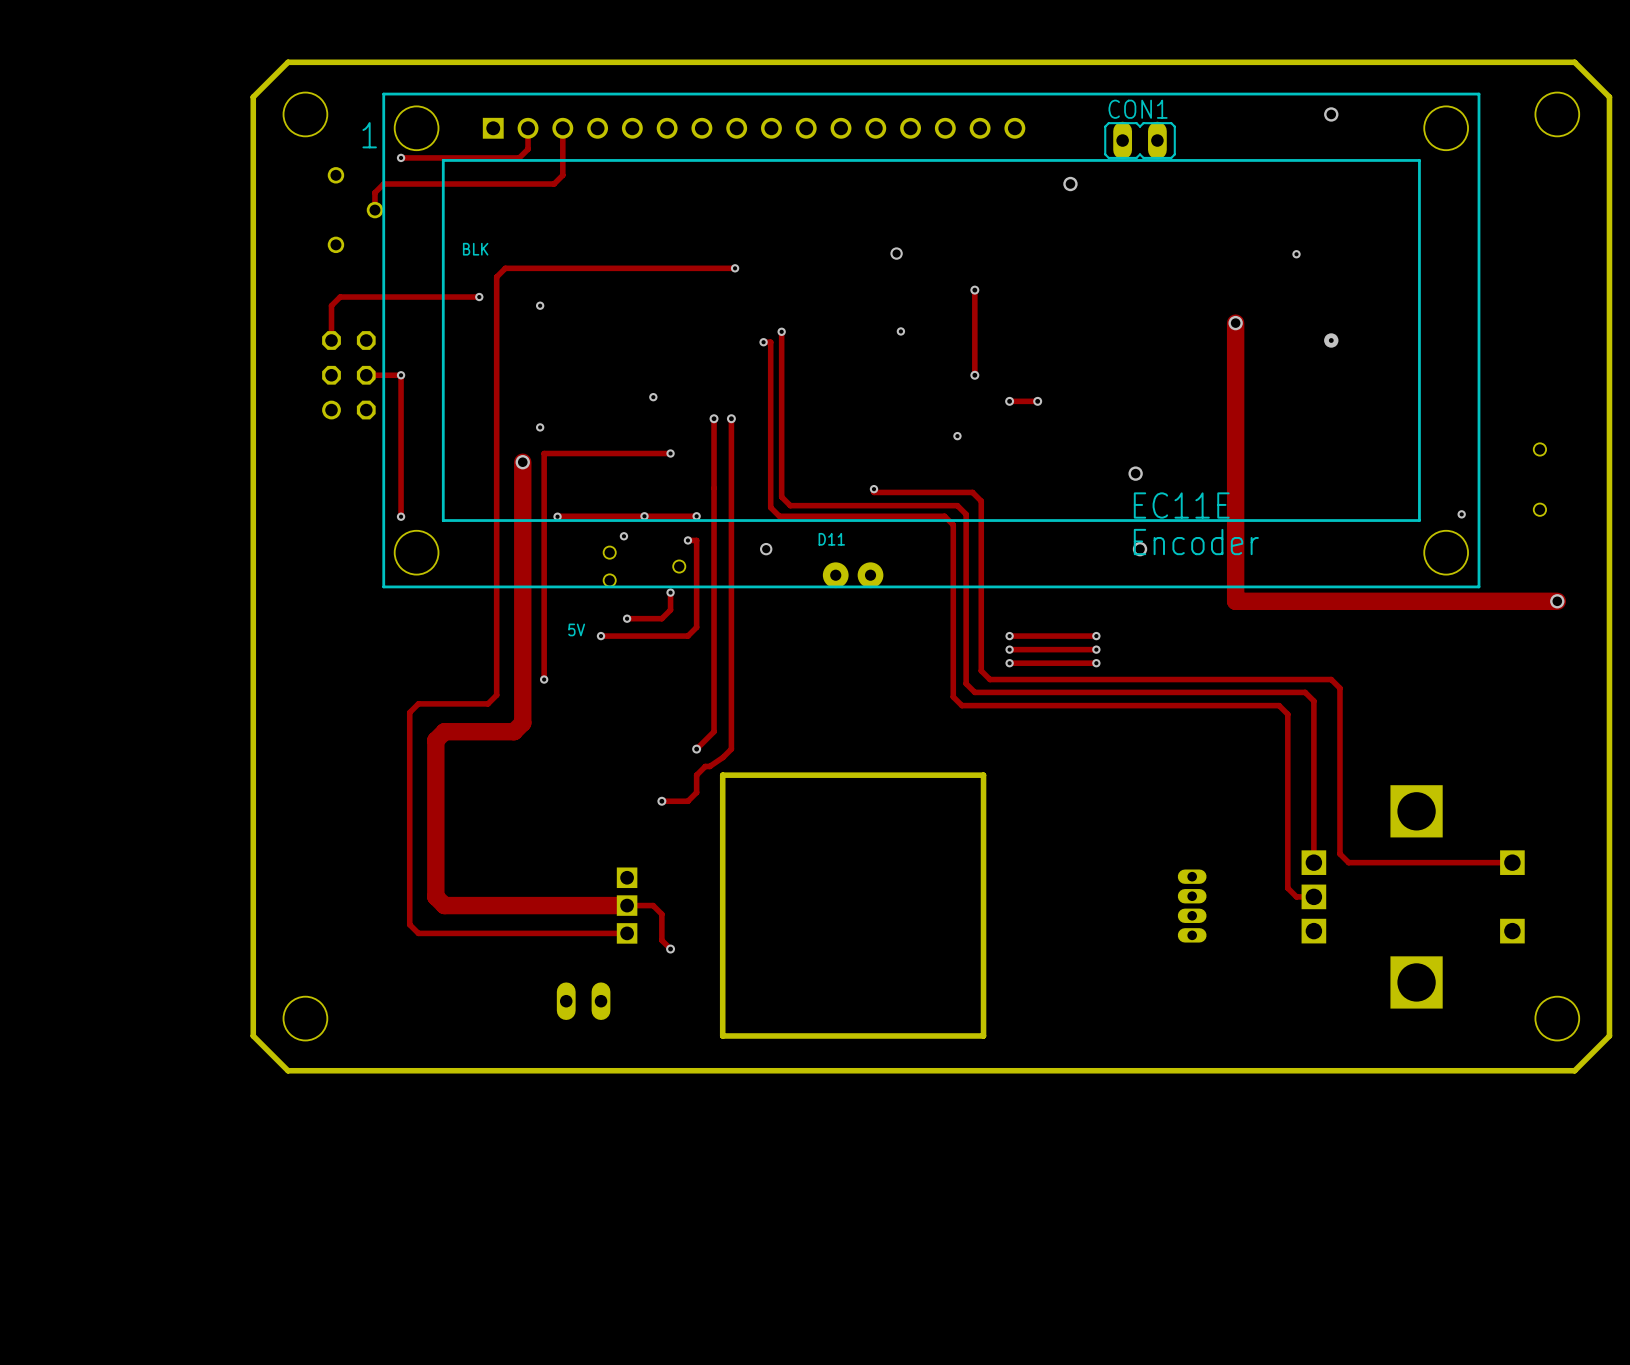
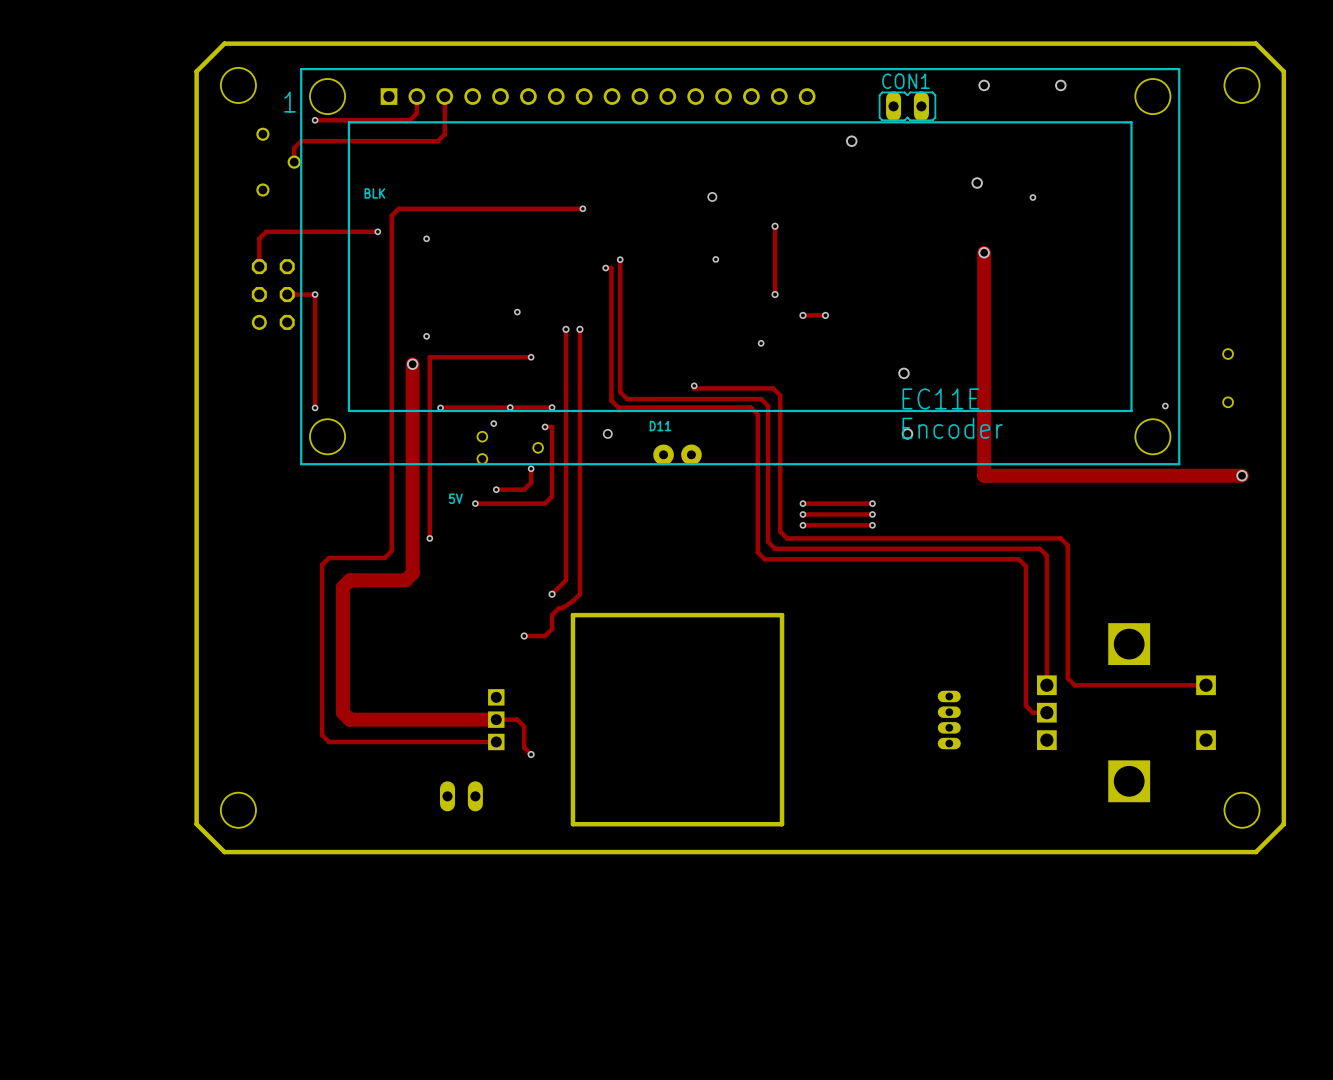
via: none -> (984, 85)
via: none -> (977, 183)
via: (1331, 340) -> none

